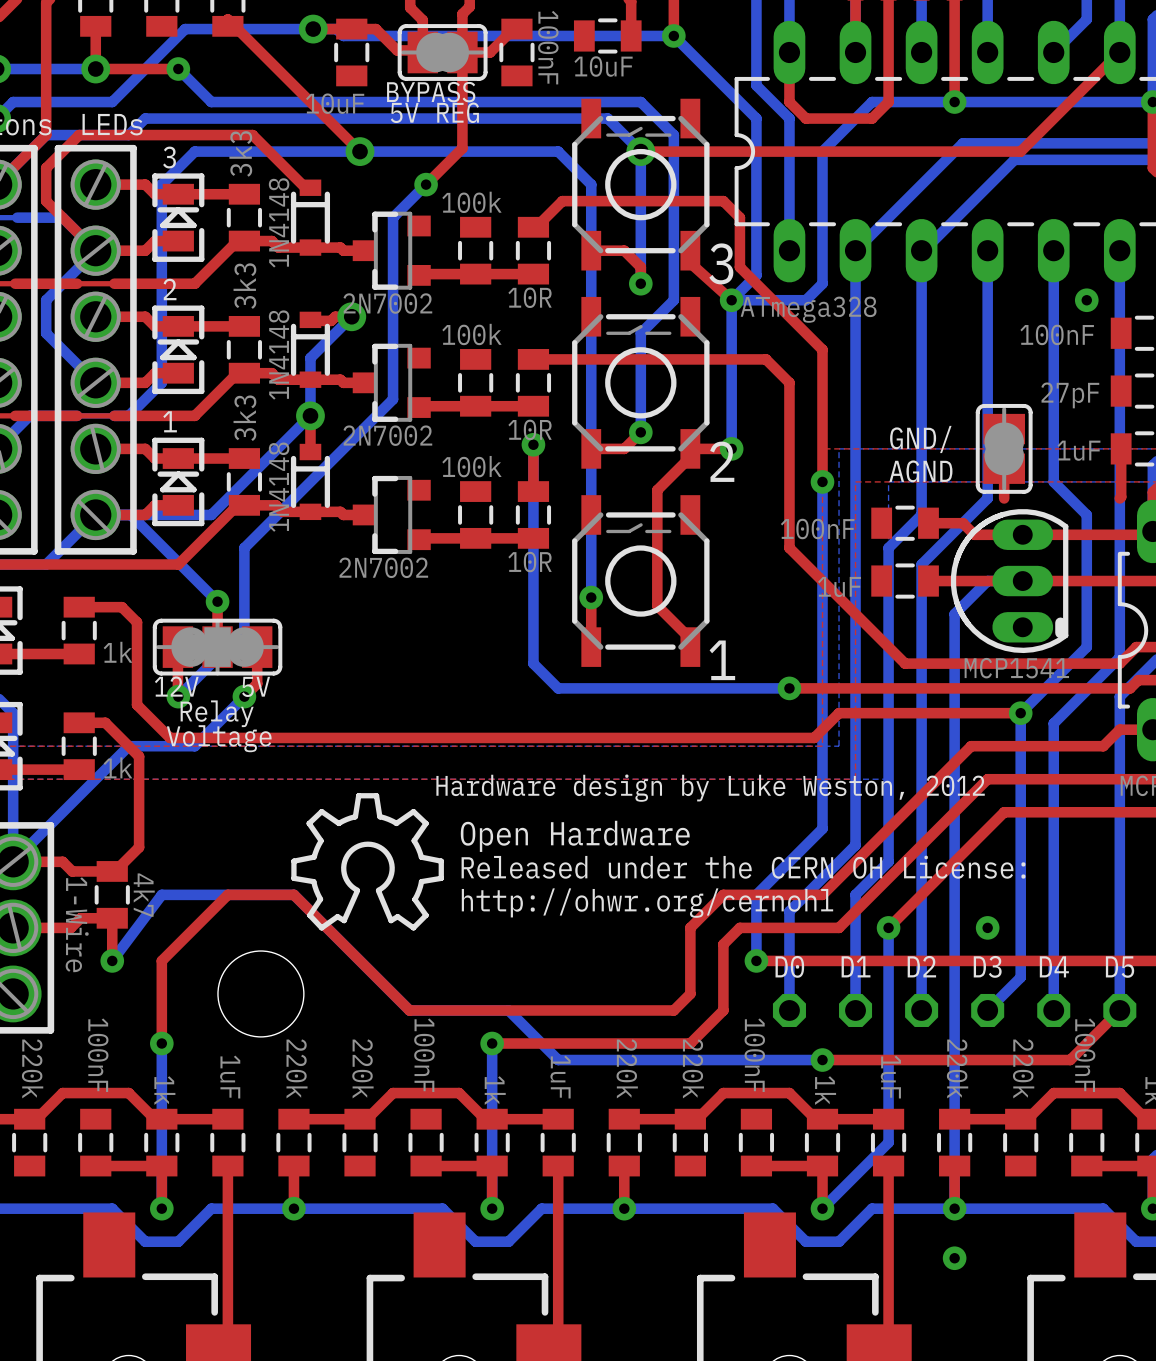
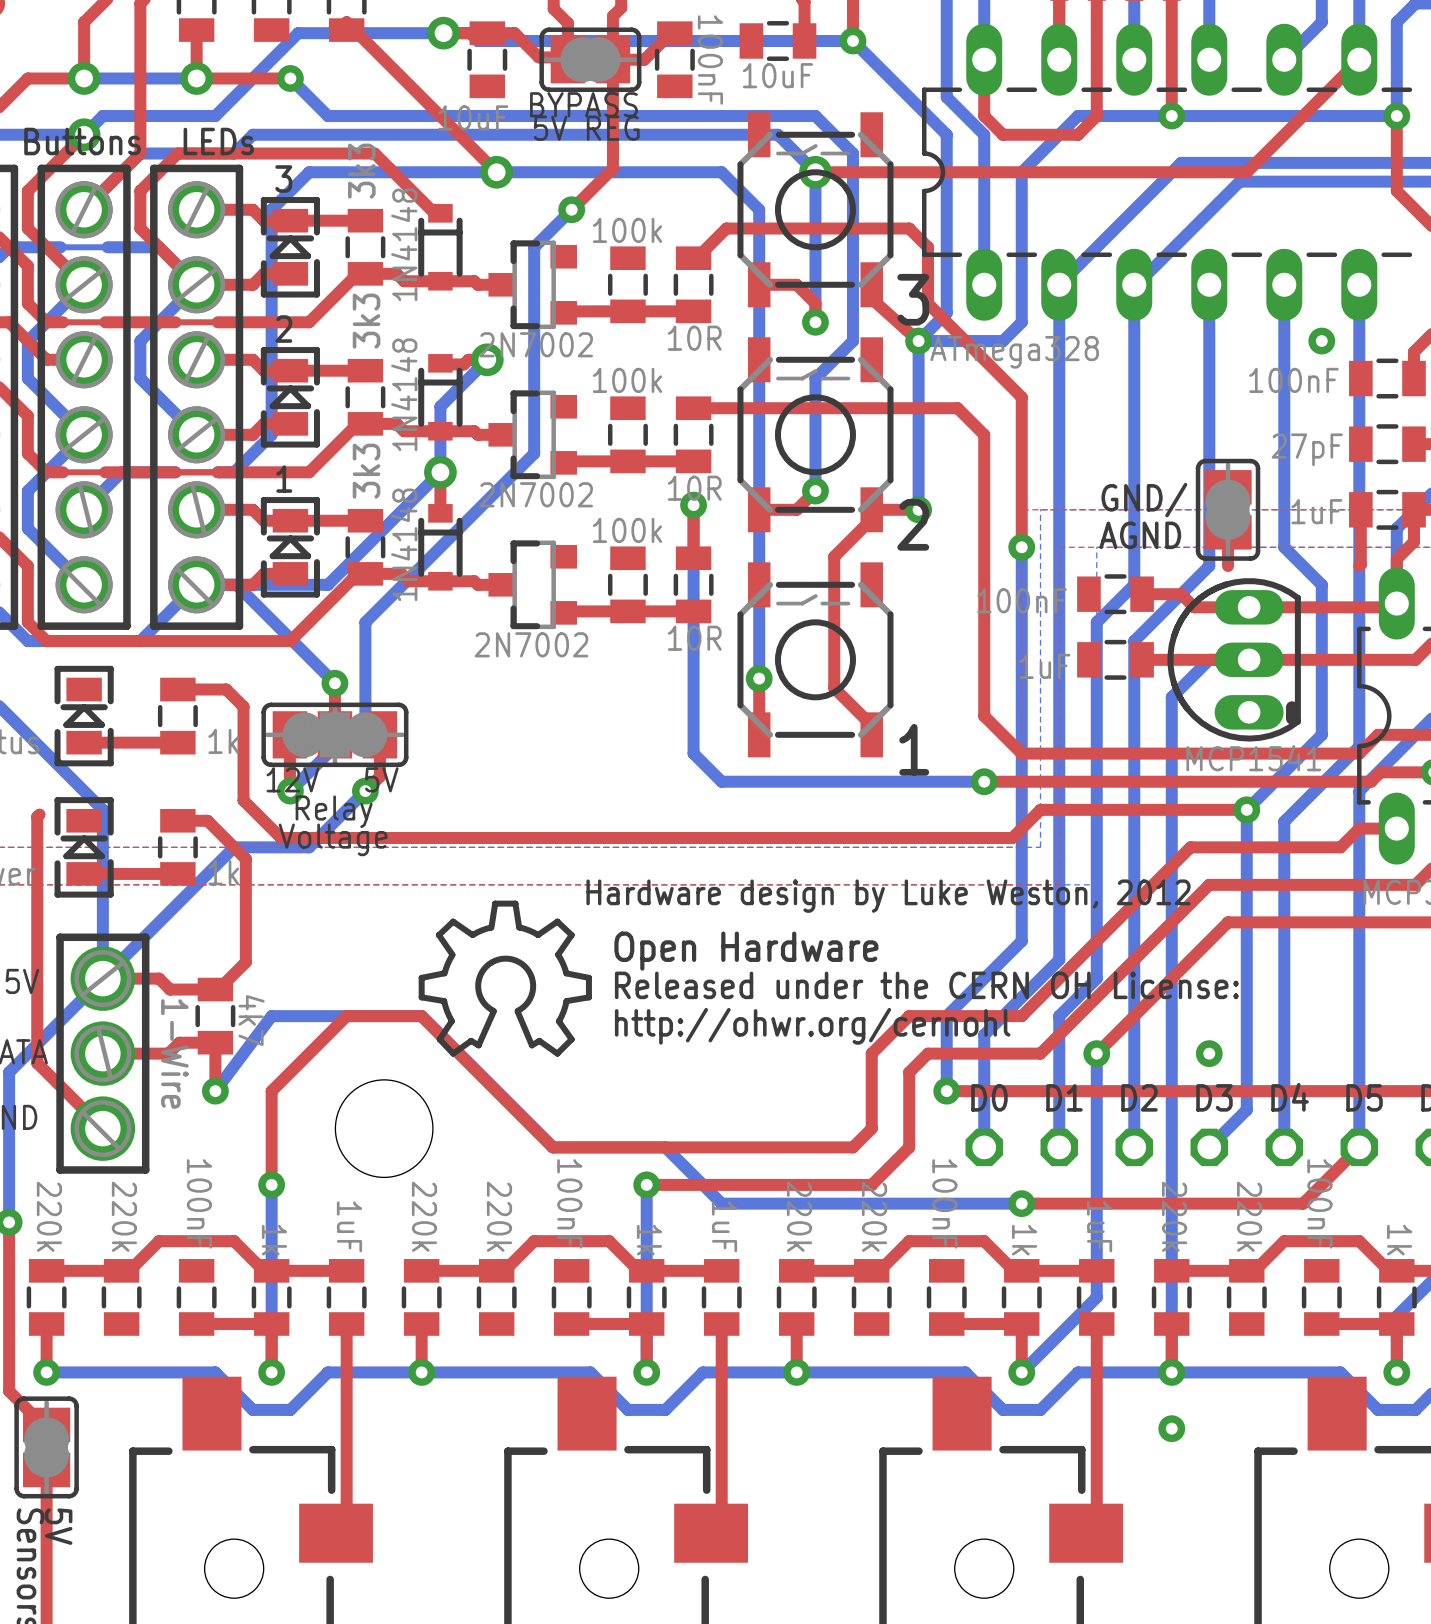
top track: (789, 548) (905, 663) -> (984, 622) (984, 716) (1021, 753) (1115, 753)

